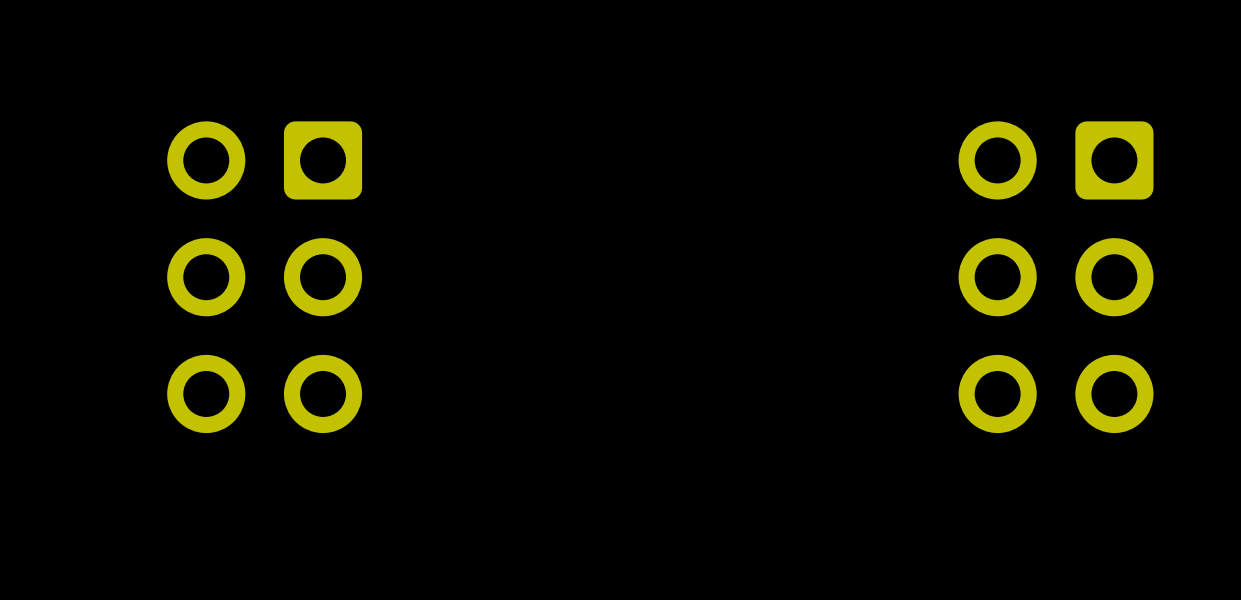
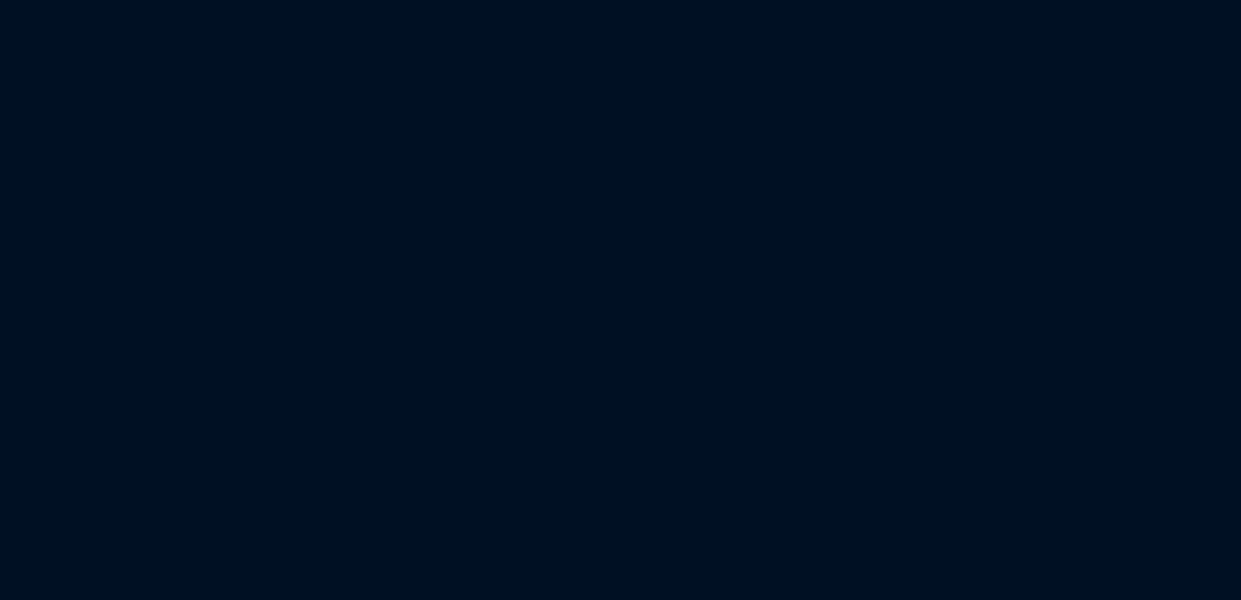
part: (264, 277) -> none
part: (1056, 277) -> none

